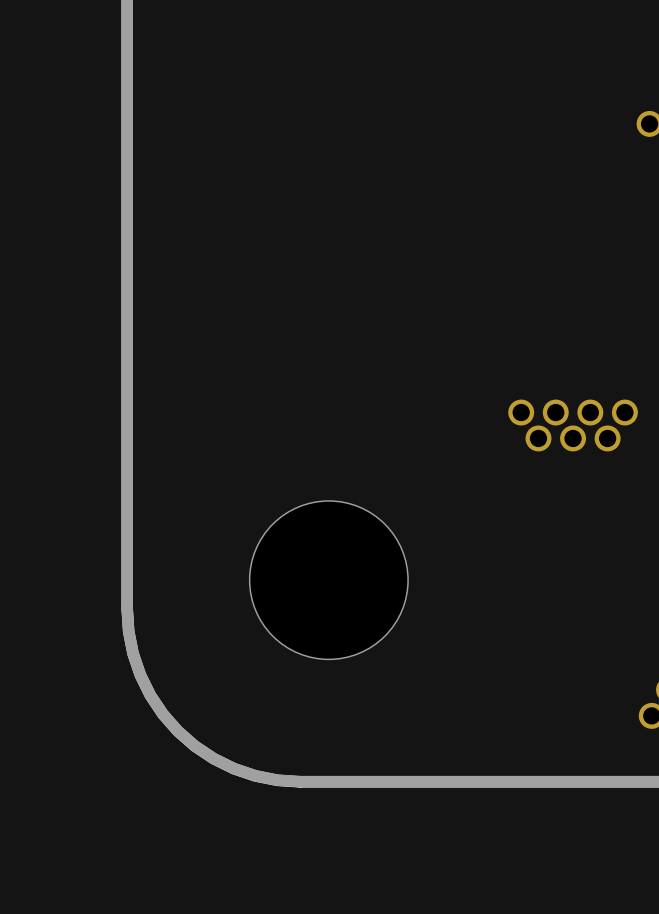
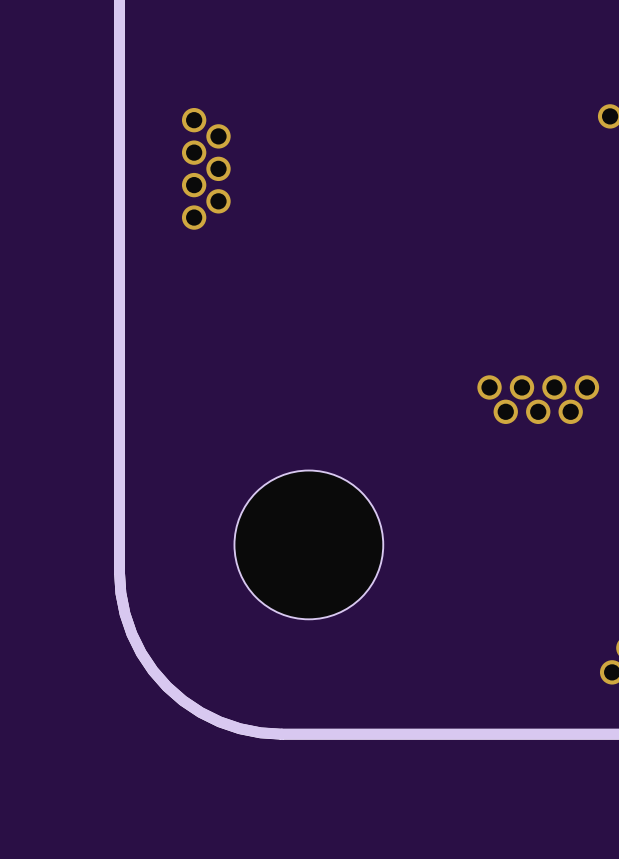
via: none -> (194, 120)
via: none -> (218, 136)
via: none -> (194, 152)
via: none -> (218, 168)
via: none -> (194, 185)
via: none -> (218, 201)
via: none -> (194, 217)

